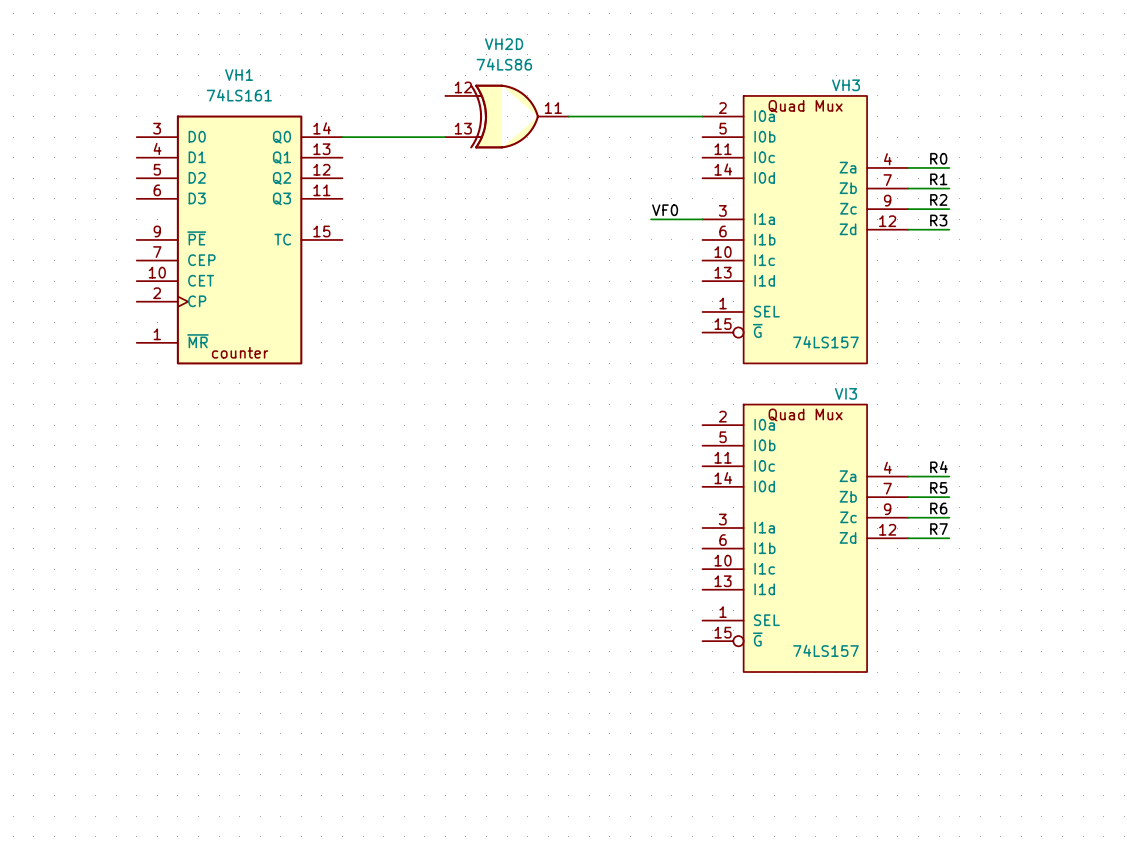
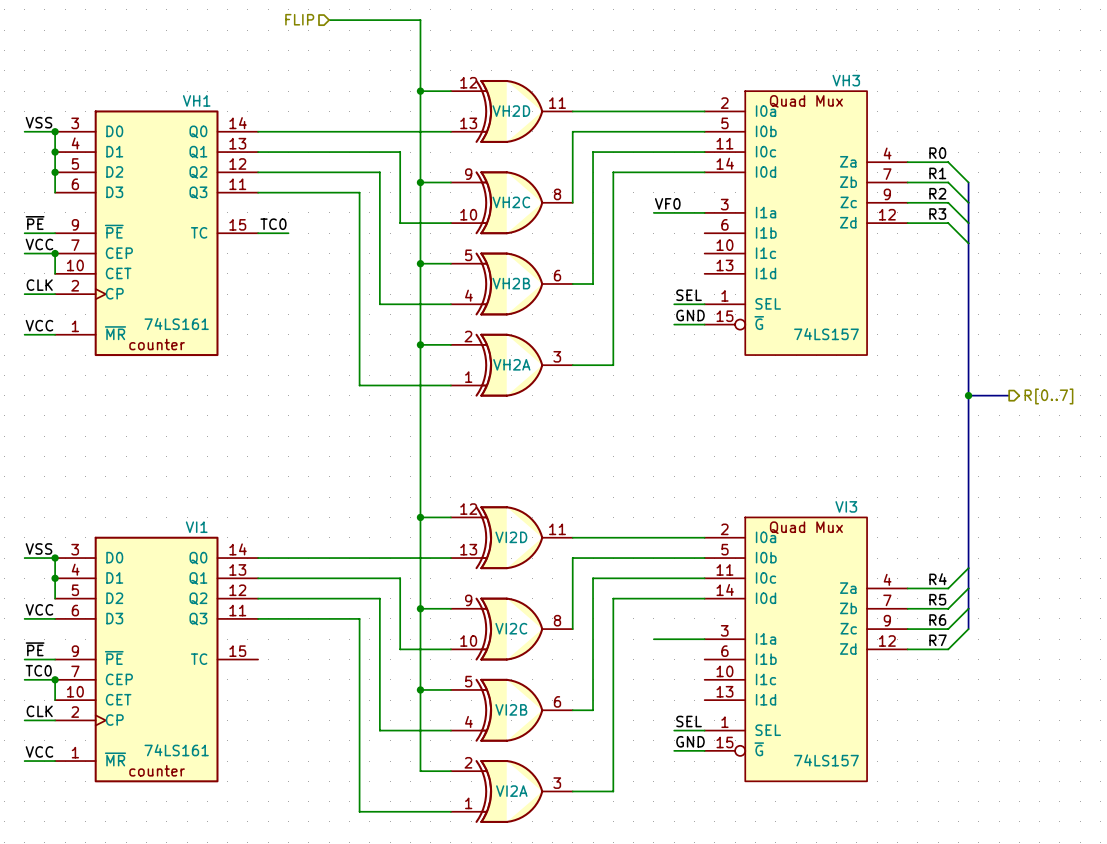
hierarchical label: none -> FLIP (299, 19)
wire: none -> (329, 20) (420, 20) (420, 771) (450, 771)
VH2D name position: VH2D (504, 44) -> VH2D (511, 111)
VH2D value: 74LS86 (504, 64) -> none
VH1 name position: VH1 (239, 75) -> VH1 (196, 100)
VH1 value position: 74LS161 (239, 95) -> 74LS161 (176, 323)
wire: none -> (420, 91) (450, 91)
junction: none -> (420, 91)
label: none -> VSS (38, 122)
wire: none -> (24, 131) (55, 131) (55, 192)
junction: none -> (55, 131)
wire: none -> (704, 131) (572, 131) (572, 202)
junction: none -> (55, 152)
wire: none -> (258, 152) (400, 152) (400, 223) (450, 223)
wire: none -> (704, 152) (593, 152) (593, 283) (572, 283)
wire: none -> (948, 162) (968, 182)
junction: none -> (55, 172)
wire: none -> (258, 172) (379, 172) (379, 304) (450, 304)
wire: none -> (704, 172) (613, 172) (613, 365) (572, 365)
wire: none -> (420, 182) (450, 182)
junction: none -> (420, 182)
wire: none -> (948, 182) (968, 202)
bus: none -> (968, 182) (968, 629)
wire: none -> (258, 192) (359, 192) (359, 385) (450, 385)
VH2C: none -> (511, 202)
wire: none -> (948, 202) (968, 223)
label: none -> ~{PE} (35, 223)
wire: none -> (948, 223) (968, 243)
label: none -> TC0 (273, 224)
wire: none -> (24, 233) (55, 233)
VH1 position: (239, 239) -> (156, 233)
label: none -> VCC (39, 244)
wire: none -> (24, 253) (55, 253) (55, 273)
junction: none -> (55, 253)
wire: none -> (420, 263) (450, 263)
junction: none -> (420, 263)
VH2B: none -> (511, 283)
label: none -> CLK (39, 285)
wire: none -> (24, 294) (55, 294)
label: none -> SEL (689, 295)
wire: none -> (674, 304) (704, 304)
label: none -> GND (690, 315)
wire: none -> (674, 324) (704, 324)
label: none -> VCC (39, 325)
wire: none -> (24, 334) (55, 334)
wire: none -> (420, 344) (450, 344)
junction: none -> (420, 344)
VH2A: none -> (511, 365)
bus: none -> (968, 395) (1009, 395)
junction: none -> (968, 395)
hierarchical label: none -> R[0..7] (1048, 396)
label position: R4 (938, 467) -> R4 (938, 579)
wire: (908, 476) (949, 476) -> none
label position: R5 (938, 487) -> R5 (937, 599)
wire: (908, 497) (949, 497) -> none
label position: R6 (938, 508) -> R6 (937, 620)
wire: (908, 517) (949, 517) -> none
wire: none -> (420, 517) (450, 517)
junction: none -> (420, 517)
label position: R7 (938, 529) -> R7 (938, 640)
VI3 position: (805, 538) -> (806, 649)
wire: (908, 538) (949, 538) -> none
VI2D: none -> (511, 537)
wire: none -> (572, 537) (704, 537)
label: none -> VSS (38, 548)
wire: none -> (24, 558) (55, 558) (55, 598)
junction: none -> (55, 558)
wire: none -> (258, 558) (450, 558)
wire: none -> (704, 558) (572, 558) (572, 629)
wire: none -> (968, 568) (948, 588) (907, 588)
junction: none -> (55, 578)
wire: none -> (258, 578) (400, 578) (400, 649) (450, 649)
wire: none -> (704, 578) (593, 578) (593, 710) (572, 710)
wire: none -> (968, 588) (948, 608) (907, 608)
wire: none -> (258, 598) (379, 598) (379, 730) (450, 730)
wire: none -> (704, 598) (613, 598) (613, 791) (572, 791)
wire: none -> (420, 608) (450, 608)
junction: none -> (420, 608)
wire: none -> (968, 608) (948, 629) (907, 629)
label: none -> VCC (39, 609)
wire: none -> (24, 618) (55, 618)
wire: none -> (258, 618) (359, 618) (359, 811) (450, 811)
VI2C: none -> (511, 629)
wire: none -> (968, 629) (948, 649) (907, 649)
wire: none -> (653, 639) (704, 639)
label: none -> ~{PE} (35, 649)
wire: none -> (24, 659) (55, 659)
VI1: none -> 74LS161 (156, 659)
label: none -> TC0 (38, 670)
wire: none -> (24, 679) (55, 679) (55, 700)
junction: none -> (55, 679)
wire: none -> (420, 689) (450, 689)
junction: none -> (420, 689)
VI2B: none -> (511, 710)
label: none -> CLK (39, 711)
wire: none -> (24, 720) (55, 720)
label: none -> SEL (689, 721)
wire: none -> (674, 730) (704, 730)
label: none -> GND (690, 741)
wire: none -> (674, 750) (704, 750)
label: none -> VCC (39, 751)
wire: none -> (24, 761) (55, 761)
VI2A: none -> (511, 791)

